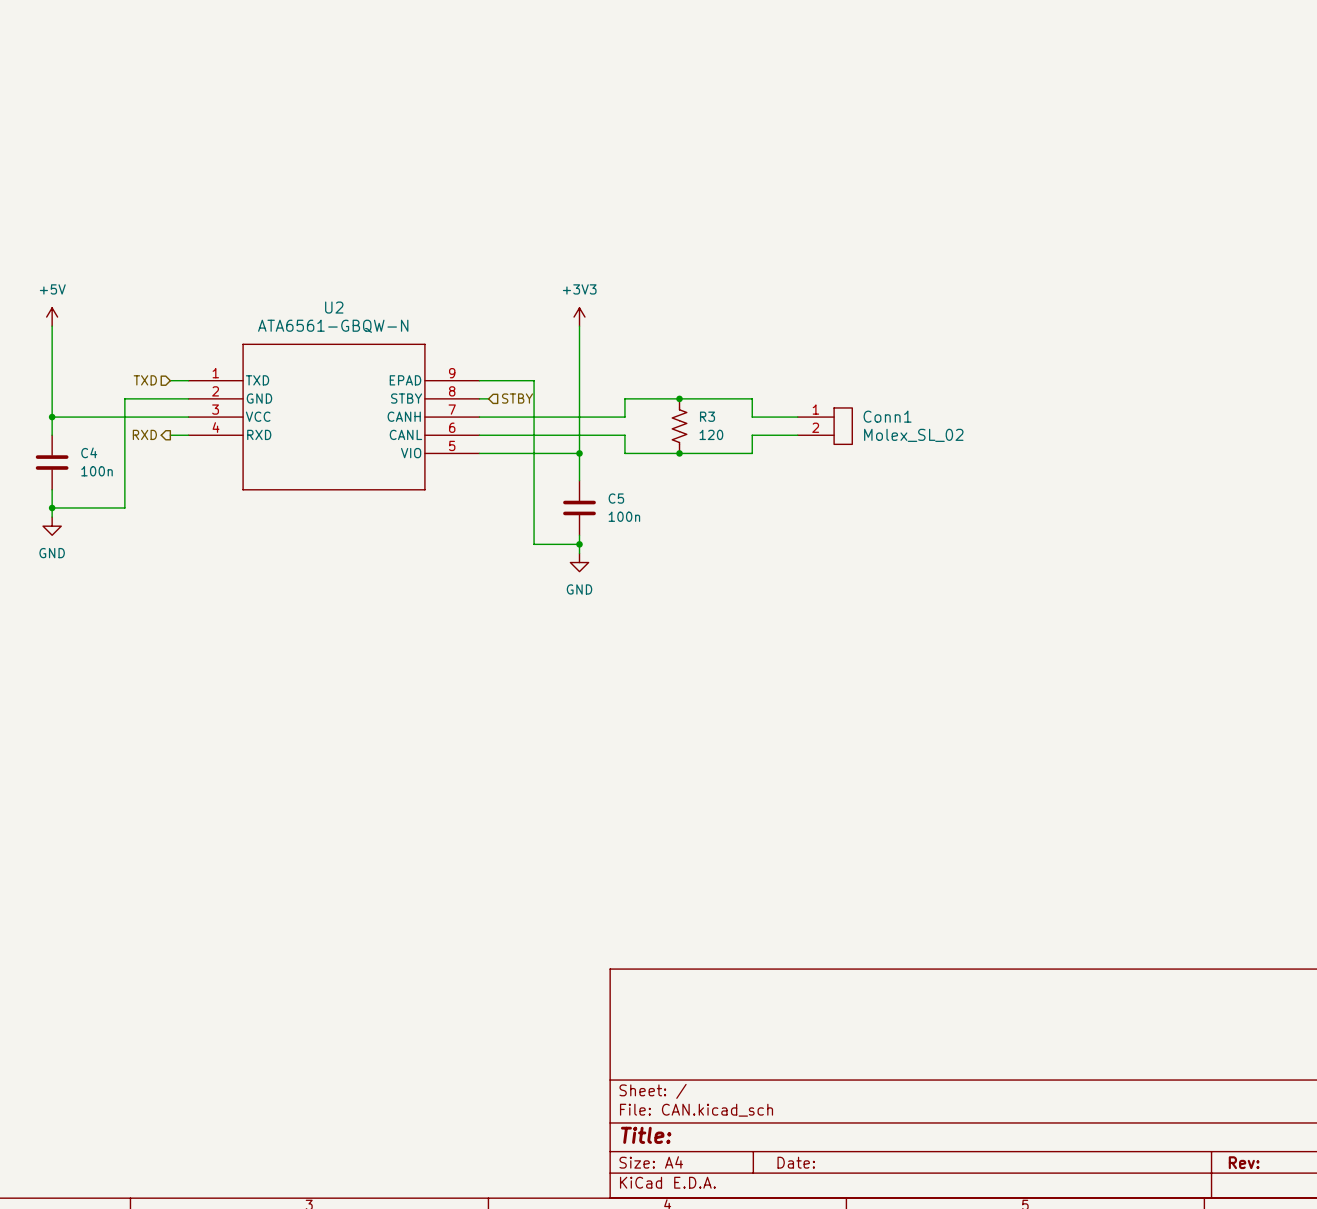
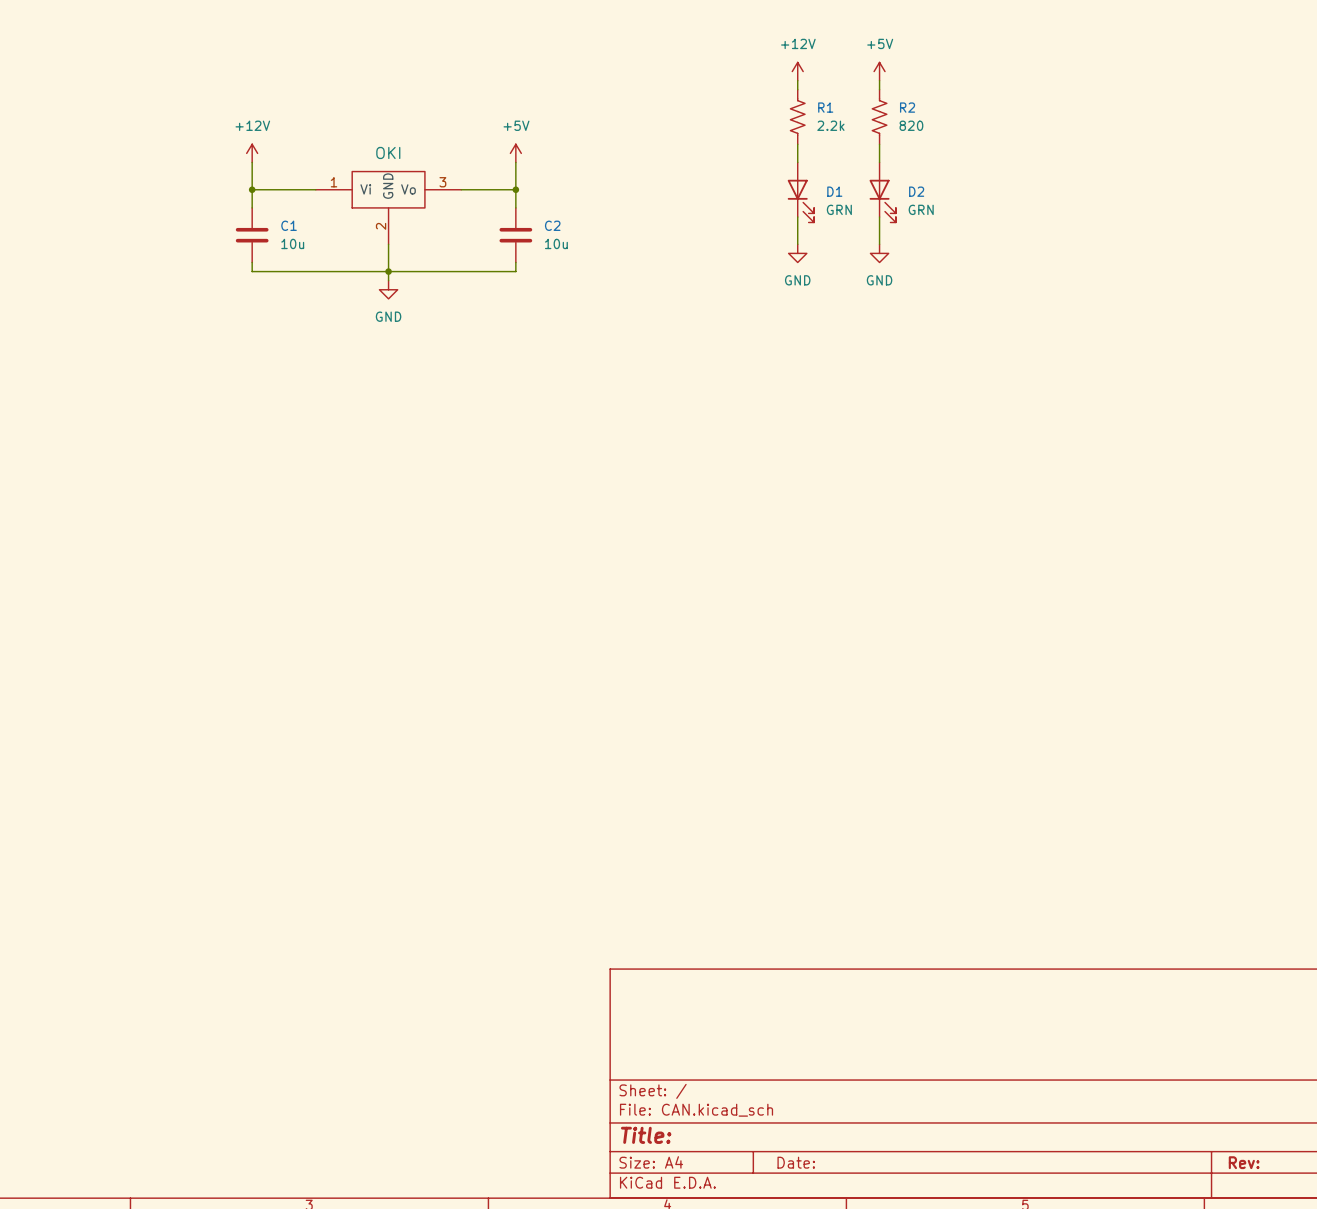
power symbol: none -> +12V (797, 71)
power symbol: none -> +5V (879, 71)
wire: none -> (797, 80) (797, 89)
wire: none -> (879, 80) (879, 89)
R1: none -> 2.2k (797, 117)
R2: none -> 820 (879, 117)
wire: none -> (797, 144) (797, 162)
wire: none -> (879, 144) (879, 162)
power symbol: none -> +12V (252, 153)
power symbol: none -> +5V (515, 153)
wire: none -> (252, 162) (252, 207)
wire: none -> (515, 162) (515, 207)
wire: none -> (252, 189) (315, 189)
junction: none -> (252, 189)
wire: none -> (461, 189) (515, 189)
junction: none -> (515, 189)
D1: none -> GRN (800, 192)
D2: none -> GRN (882, 192)
part: none -> OKI (388, 207)
wire: none -> (797, 217) (797, 244)
wire: none -> (879, 217) (879, 244)
C1: none -> 10u (252, 235)
C2: none -> 10u (515, 235)
wire: none -> (388, 244) (388, 280)
power symbol: none -> GND (797, 253)
power symbol: none -> GND (879, 253)
wire: none -> (252, 262) (252, 271) (515, 271) (515, 262)
junction: none -> (388, 271)
power symbol: none -> GND (388, 289)
power symbol: +5V (52, 317) -> none
power symbol: +3V3 (579, 317) -> none
wire: (52, 326) (52, 435) -> none
wire: (579, 326) (579, 480) -> none
hierarchical label: TXD (145, 380) -> none
wire: (170, 380) (188, 380) -> none
wire: (479, 380) (534, 380) (534, 544) (579, 544) -> none
wire: (188, 398) (124, 398) (124, 507) (52, 507) -> none
wire: (479, 398) (488, 398) -> none
hierarchical label: STBY (517, 398) -> none
junction: (679, 398) -> none
wire: (52, 417) (188, 417) -> none
junction: (52, 417) -> none
U2: ATA6561-GBQW-N (334, 417) -> none
wire: (479, 417) (624, 417) (624, 398) (752, 398) (752, 417) (797, 417) -> none
R3: 120 (679, 426) -> none
Conn1: Molex_SL_02 (825, 426) -> none
hierarchical label: RXD (144, 434) -> none
wire: (170, 435) (188, 435) -> none
wire: (479, 435) (624, 435) (624, 453) (752, 453) (752, 435) (797, 435) -> none
wire: (479, 453) (579, 453) -> none
junction: (579, 453) -> none
junction: (679, 453) -> none
C4: 100n (52, 462) -> none
wire: (52, 489) (52, 517) -> none
junction: (52, 507) -> none
C5: 100n (579, 507) -> none
power symbol: GND (52, 526) -> none
wire: (579, 535) (579, 553) -> none
junction: (579, 544) -> none
power symbol: GND (579, 562) -> none

